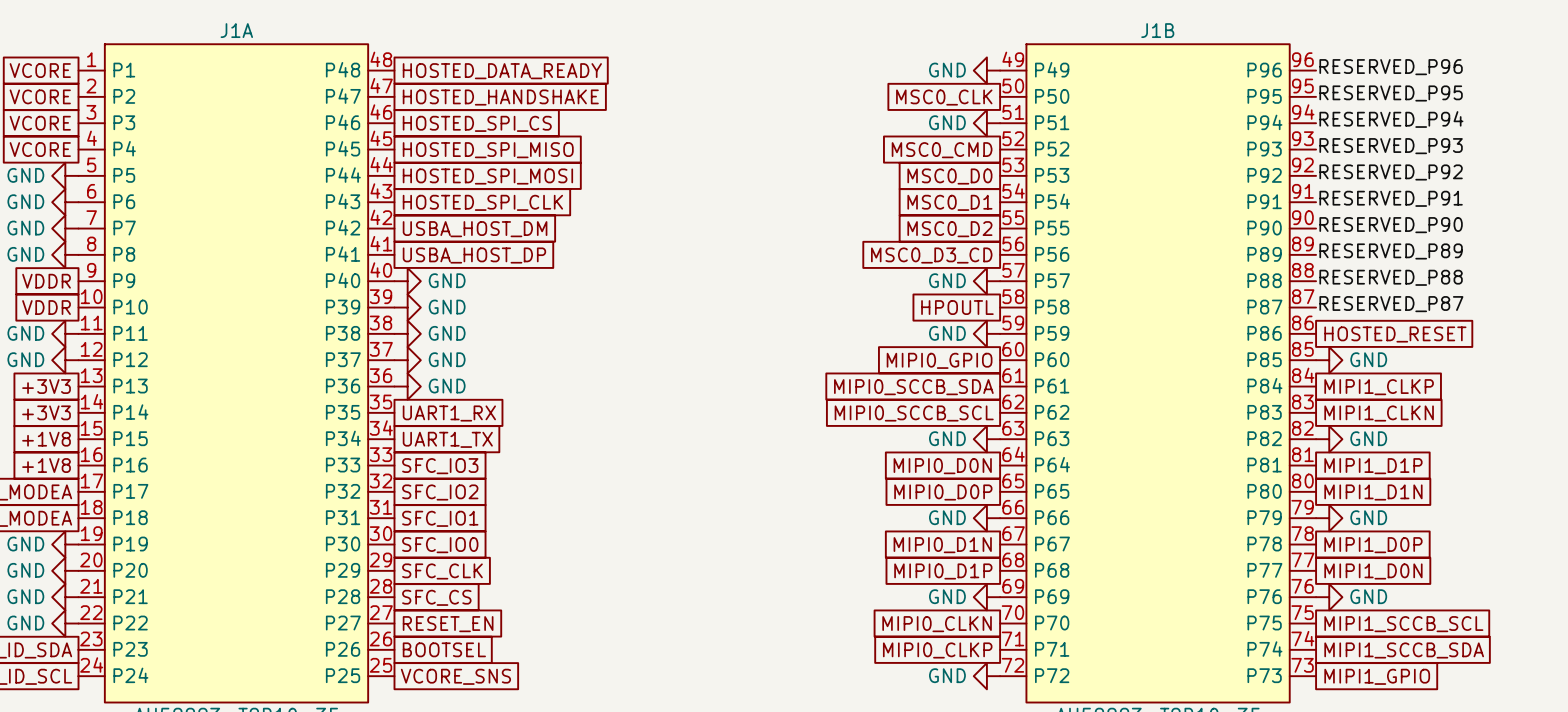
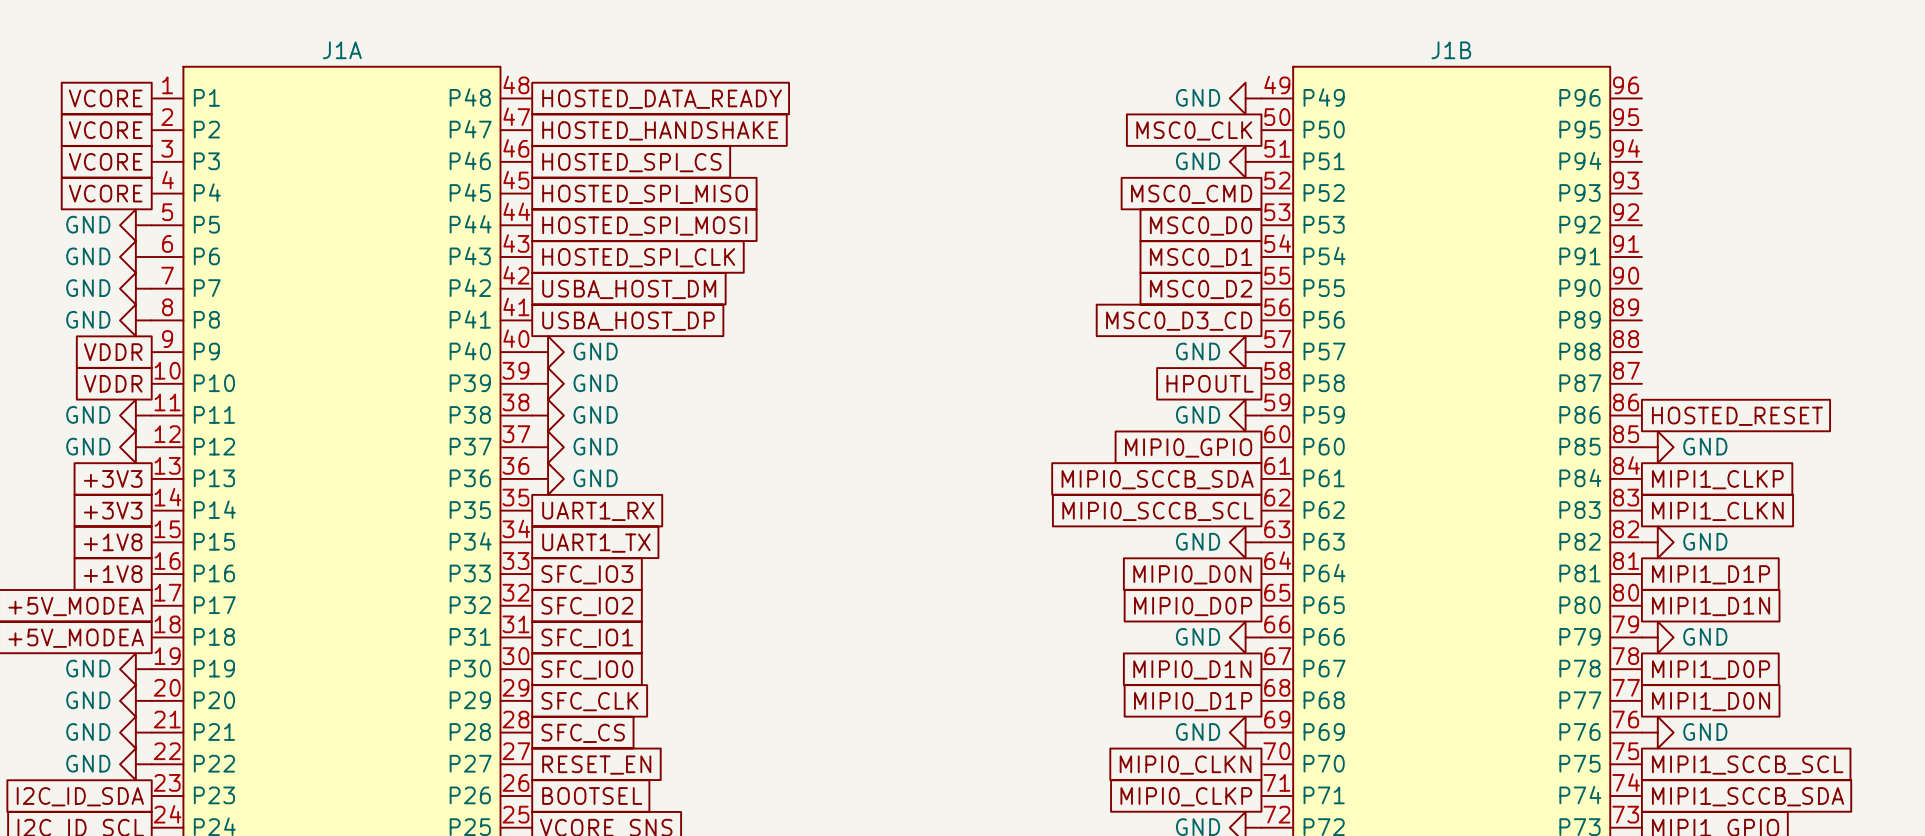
label: RESERVED_P96 (1391, 67) -> none
label: RESERVED_P95 (1391, 93) -> none
label: RESERVED_P94 (1391, 119) -> none
label: RESERVED_P93 (1391, 146) -> none
label: RESERVED_P92 (1391, 172) -> none
label: RESERVED_P91 (1391, 198) -> none
label: RESERVED_P90 (1391, 225) -> none
label: RESERVED_P89 (1391, 251) -> none
label: RESERVED_P88 (1391, 277) -> none
label: RESERVED_P87 (1391, 304) -> none

